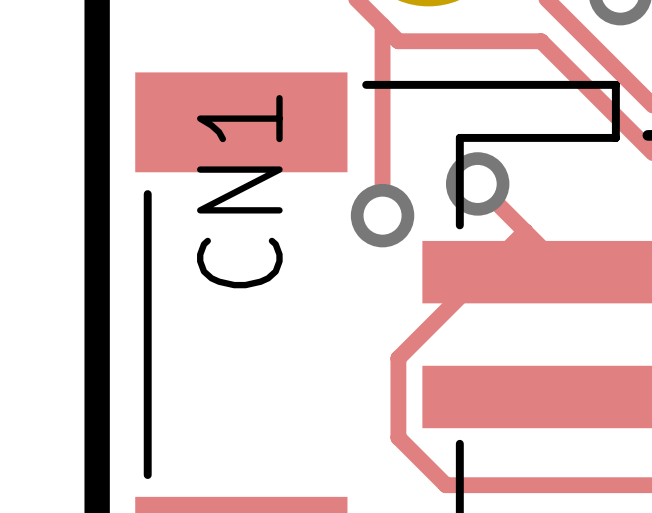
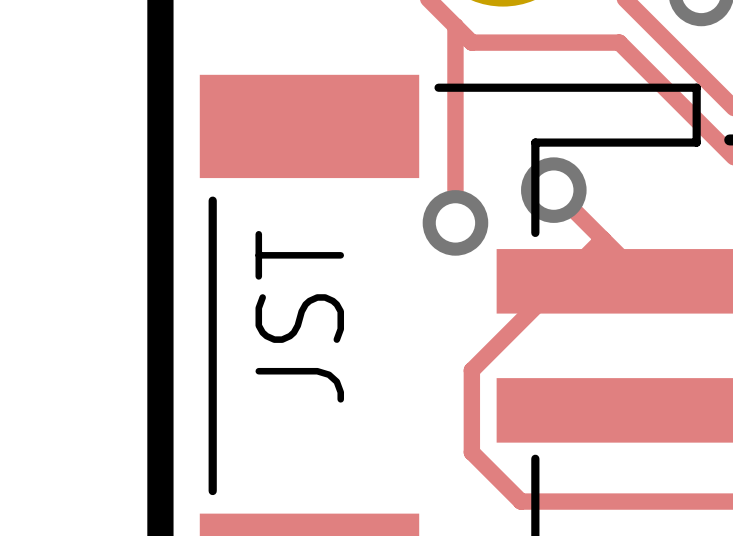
CN1 name: CN1 (239, 191) -> none
text: none -> JST (299, 316)

